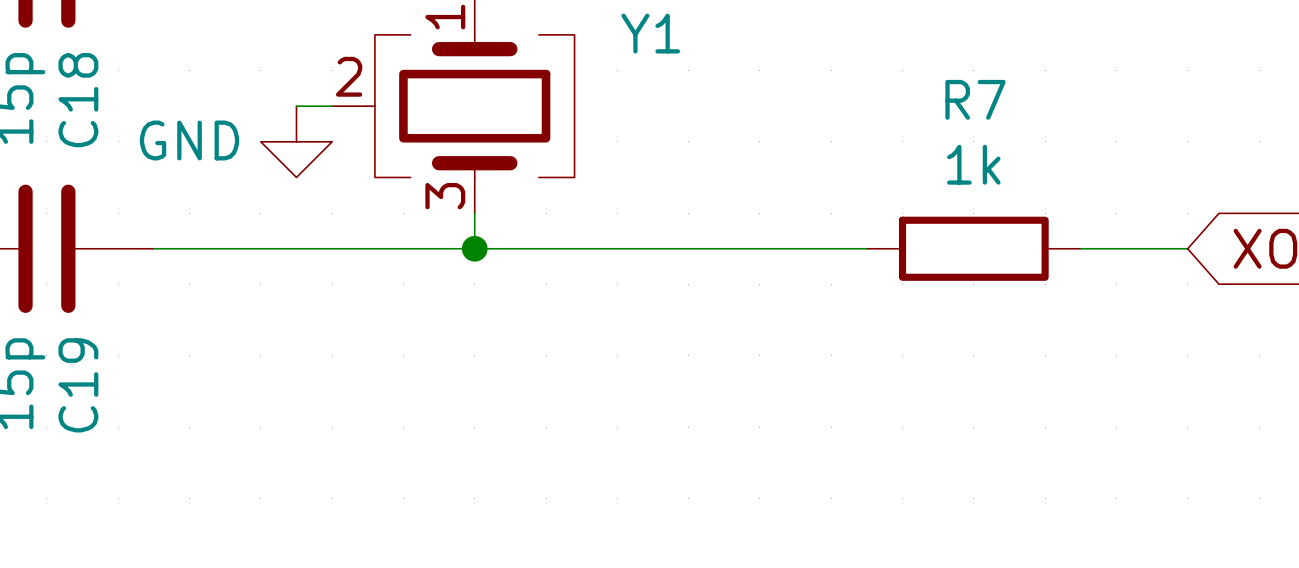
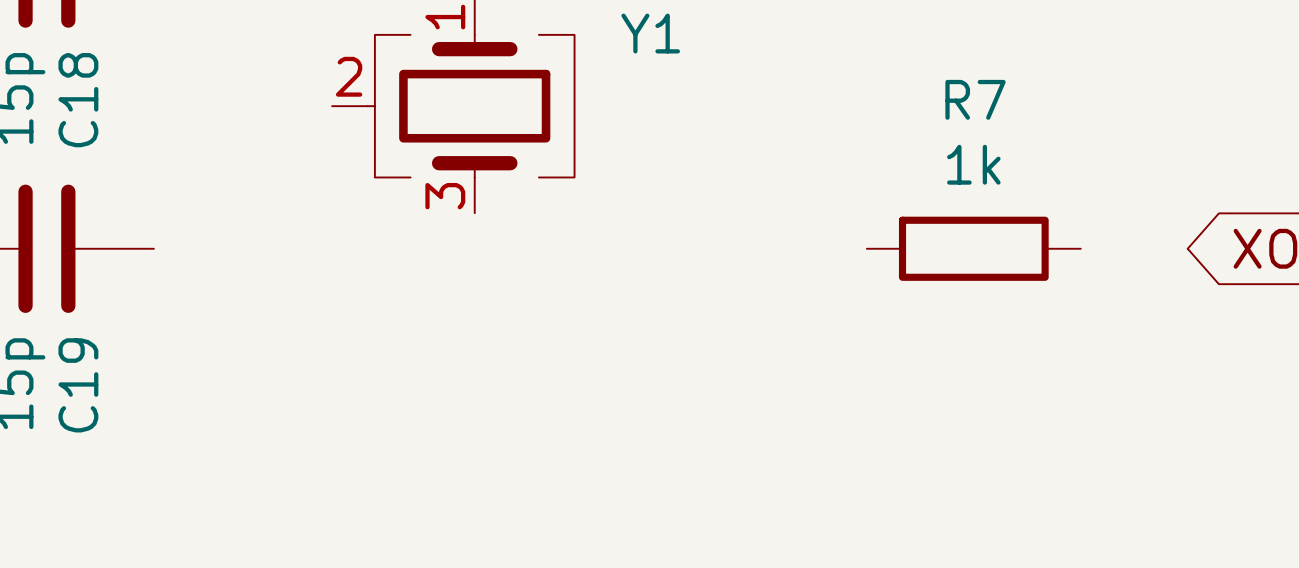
wire: (296, 106) (332, 106) -> none
power symbol: GND (296, 141) -> none
wire: (474, 213) (474, 248) -> none
wire: (153, 248) (866, 248) -> none
junction: (474, 248) -> none
wire: (1080, 248) (1187, 248) -> none

